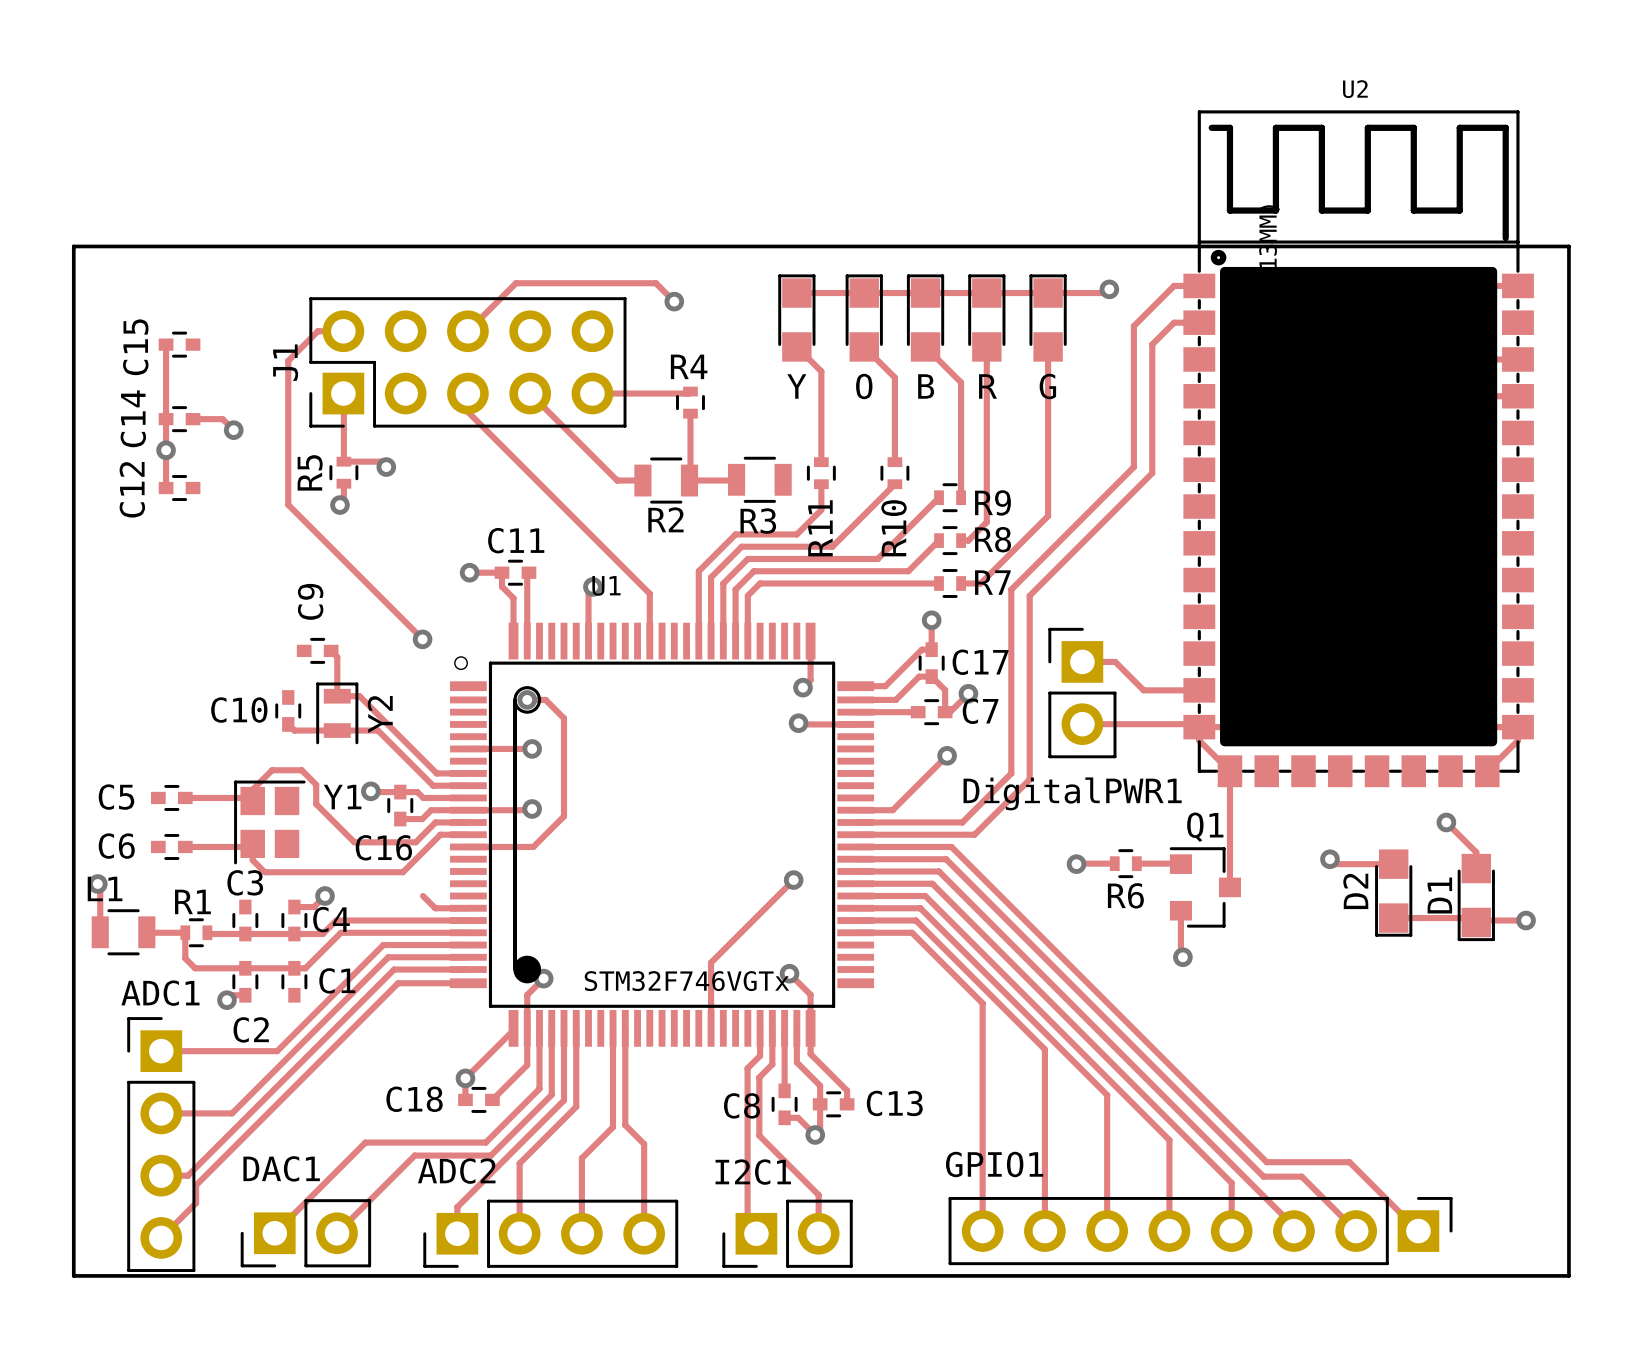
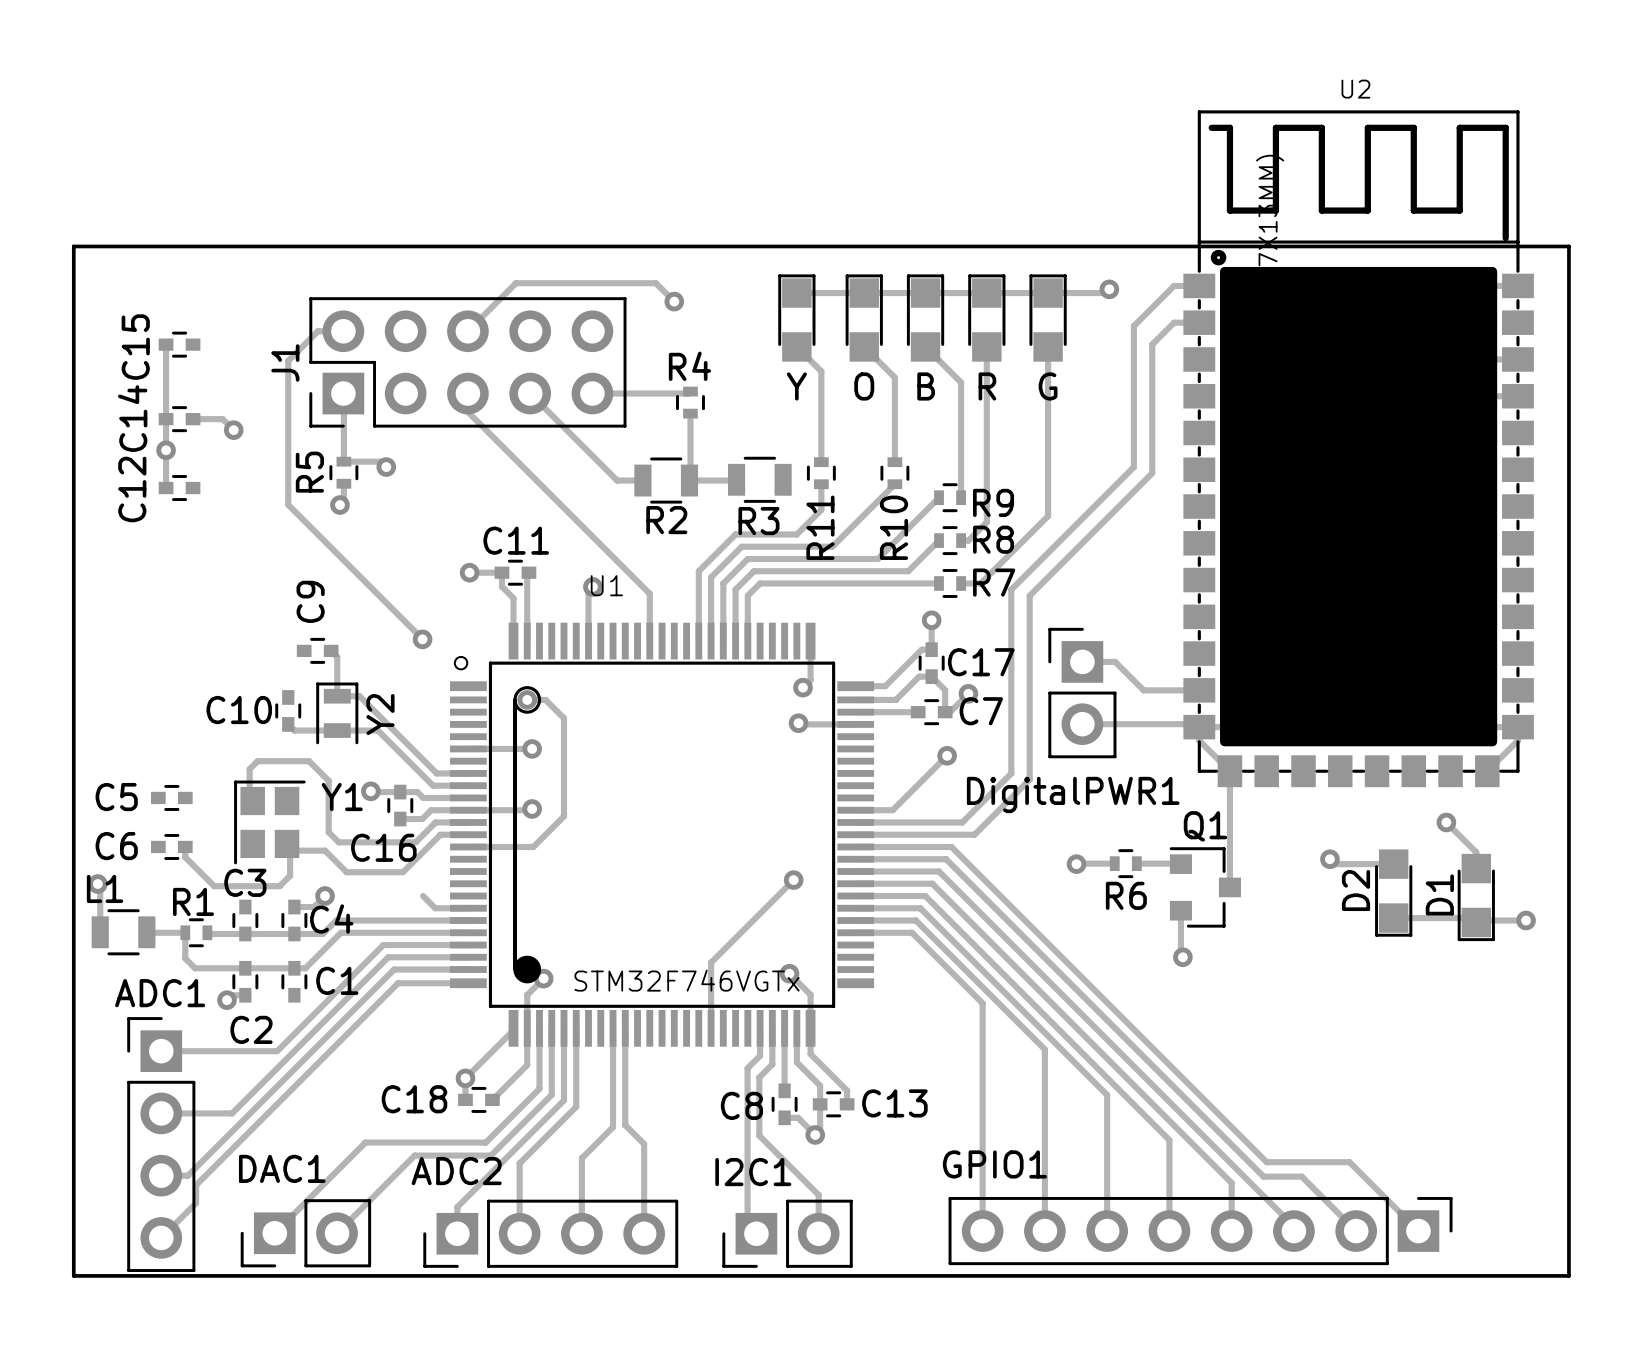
track: (185, 797) (249, 797) (252, 801) (252, 789) (272, 770) (301, 770) (316, 784) (316, 804) (354, 842) -> (249, 794) (249, 769) (257, 761) (309, 761) (328, 780) (328, 832) (338, 842) (354, 842)
track: (185, 846) (249, 846) (252, 843) (252, 860) (264, 872) (346, 872) -> (185, 845) (185, 857) (214, 886) (279, 886) (290, 875) (290, 850) (325, 850) (346, 872)

